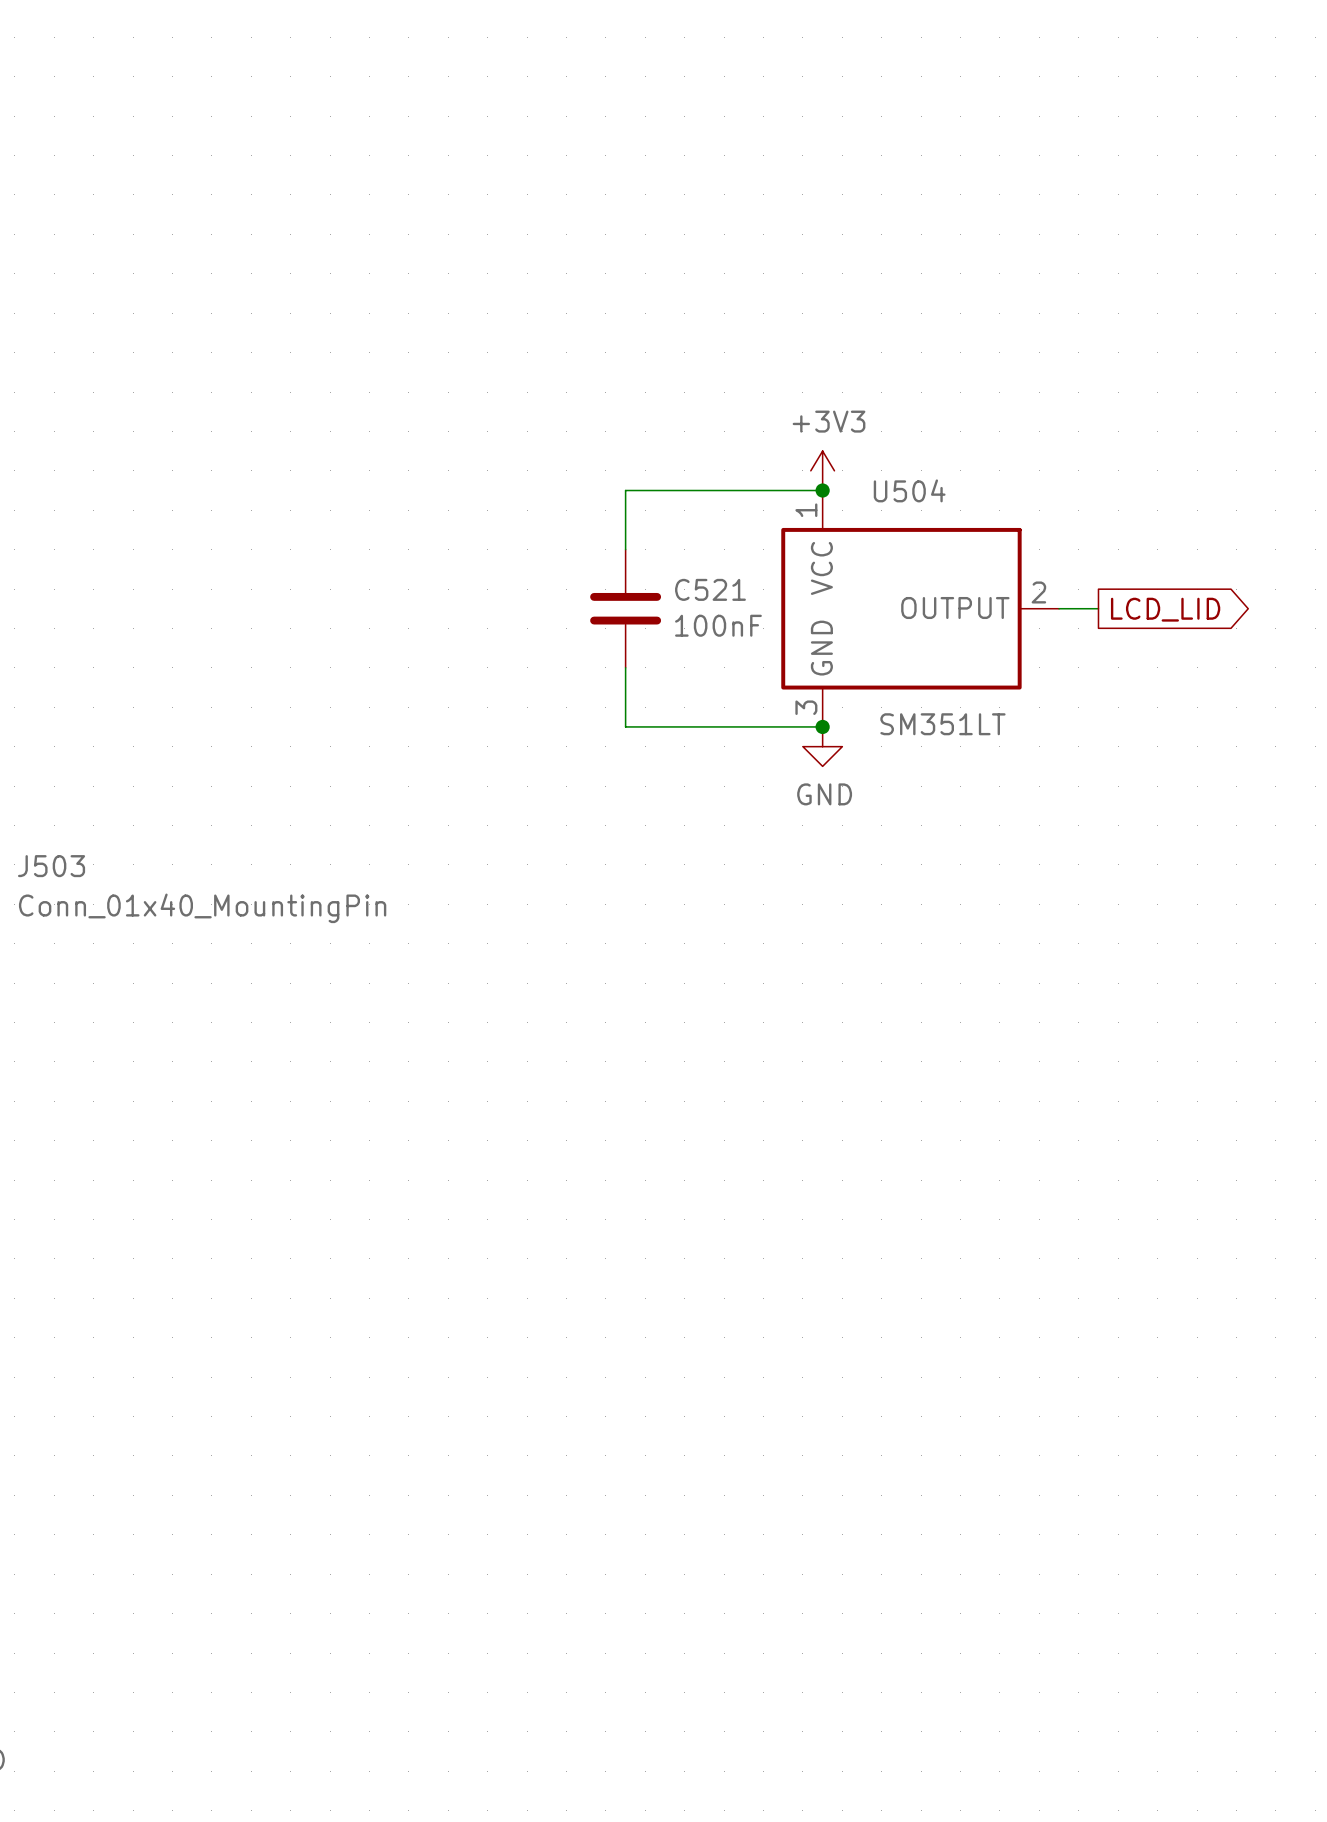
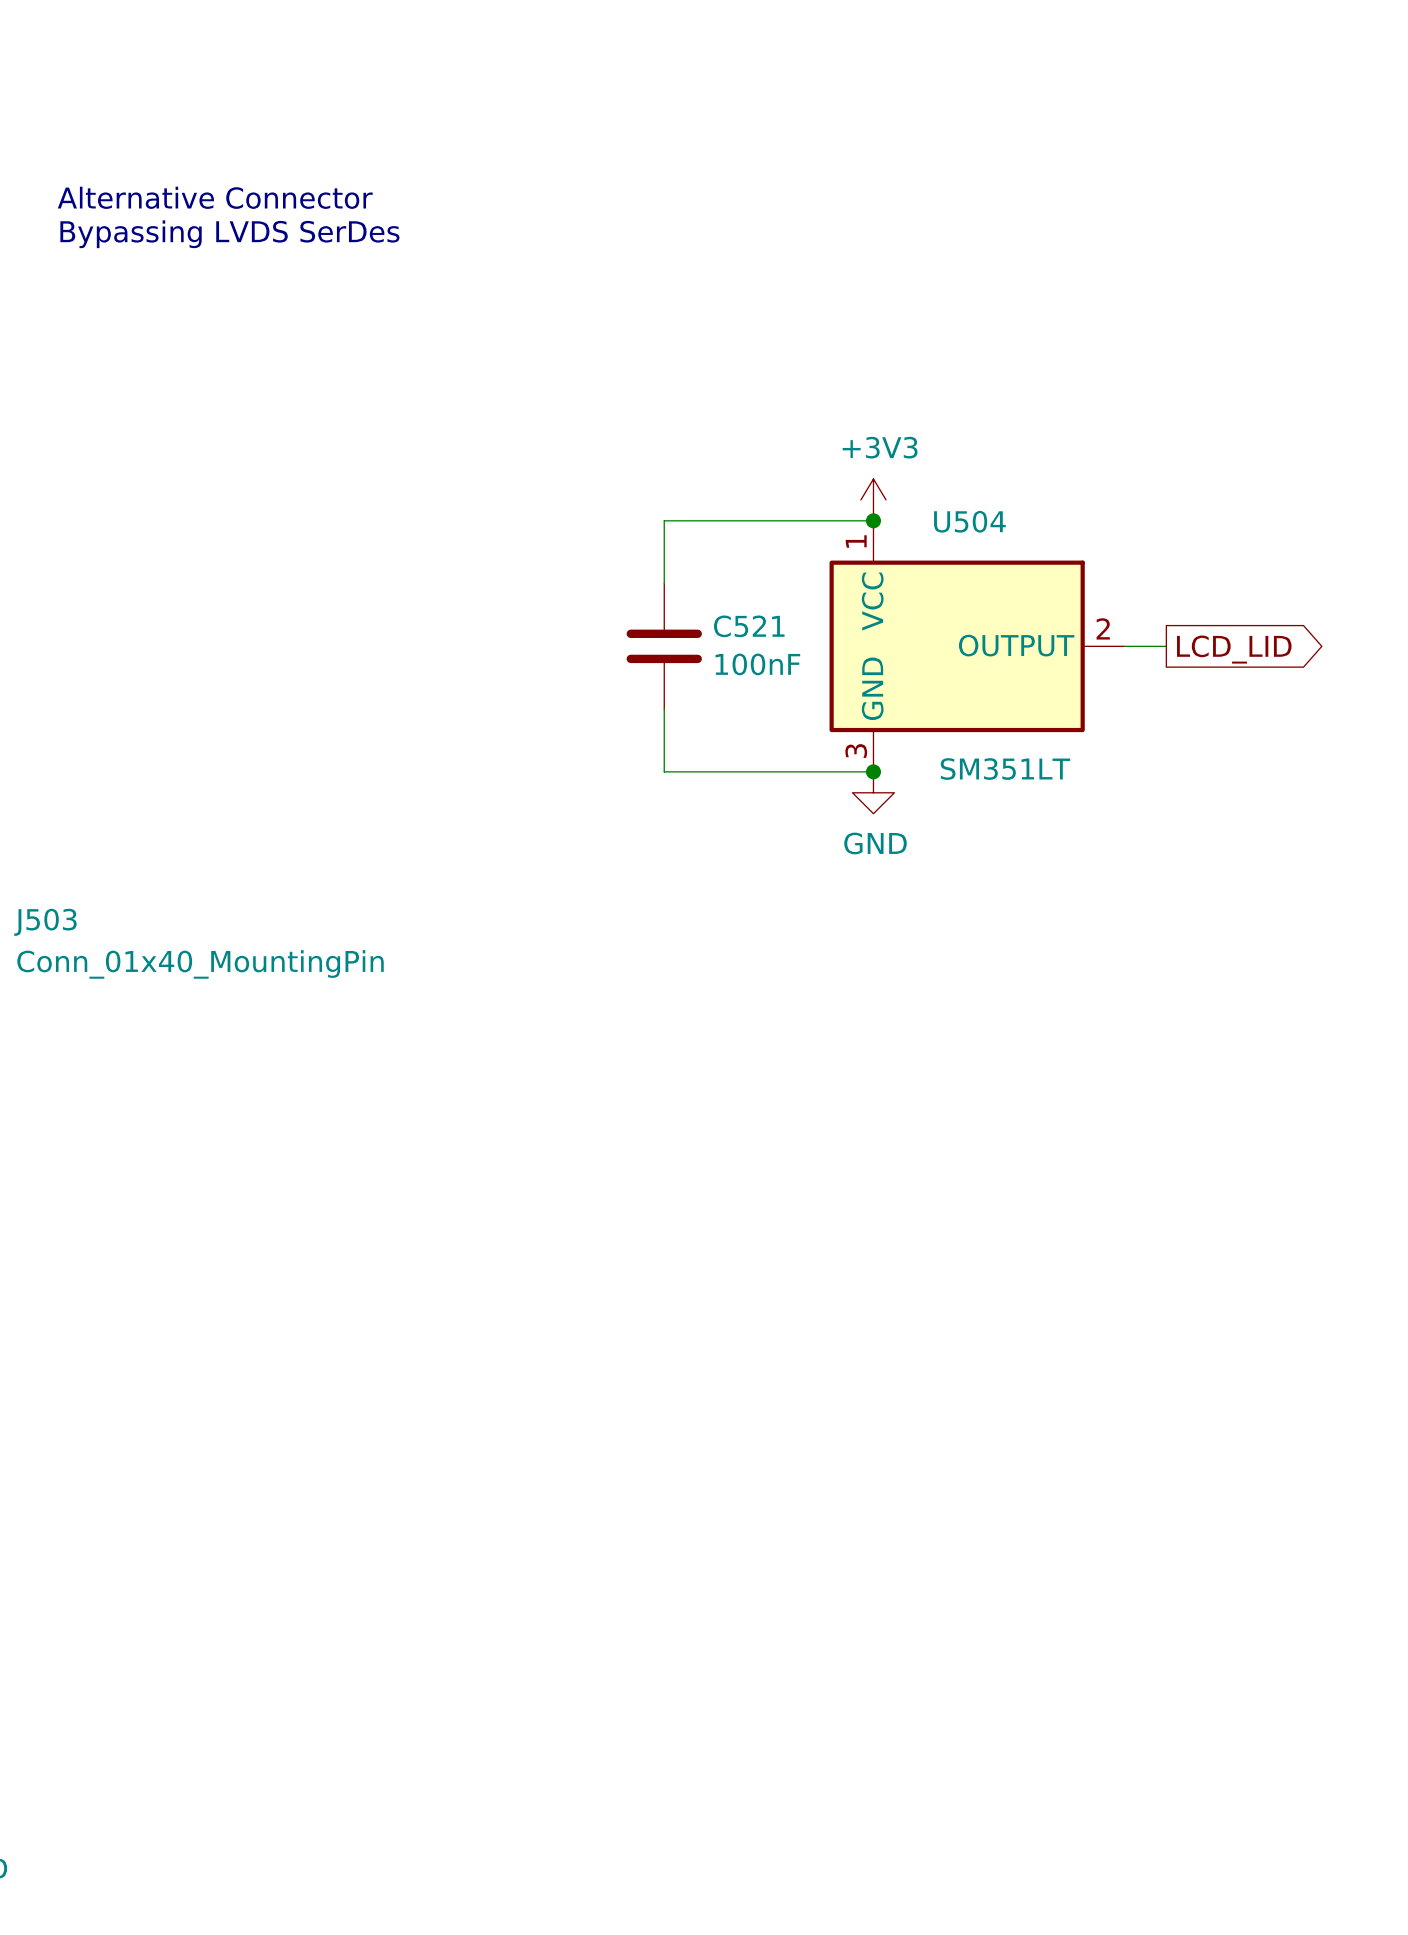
text: none -> Alternative Connector (215, 197)
text: none -> Bypassing LVDS SerDes (229, 234)

